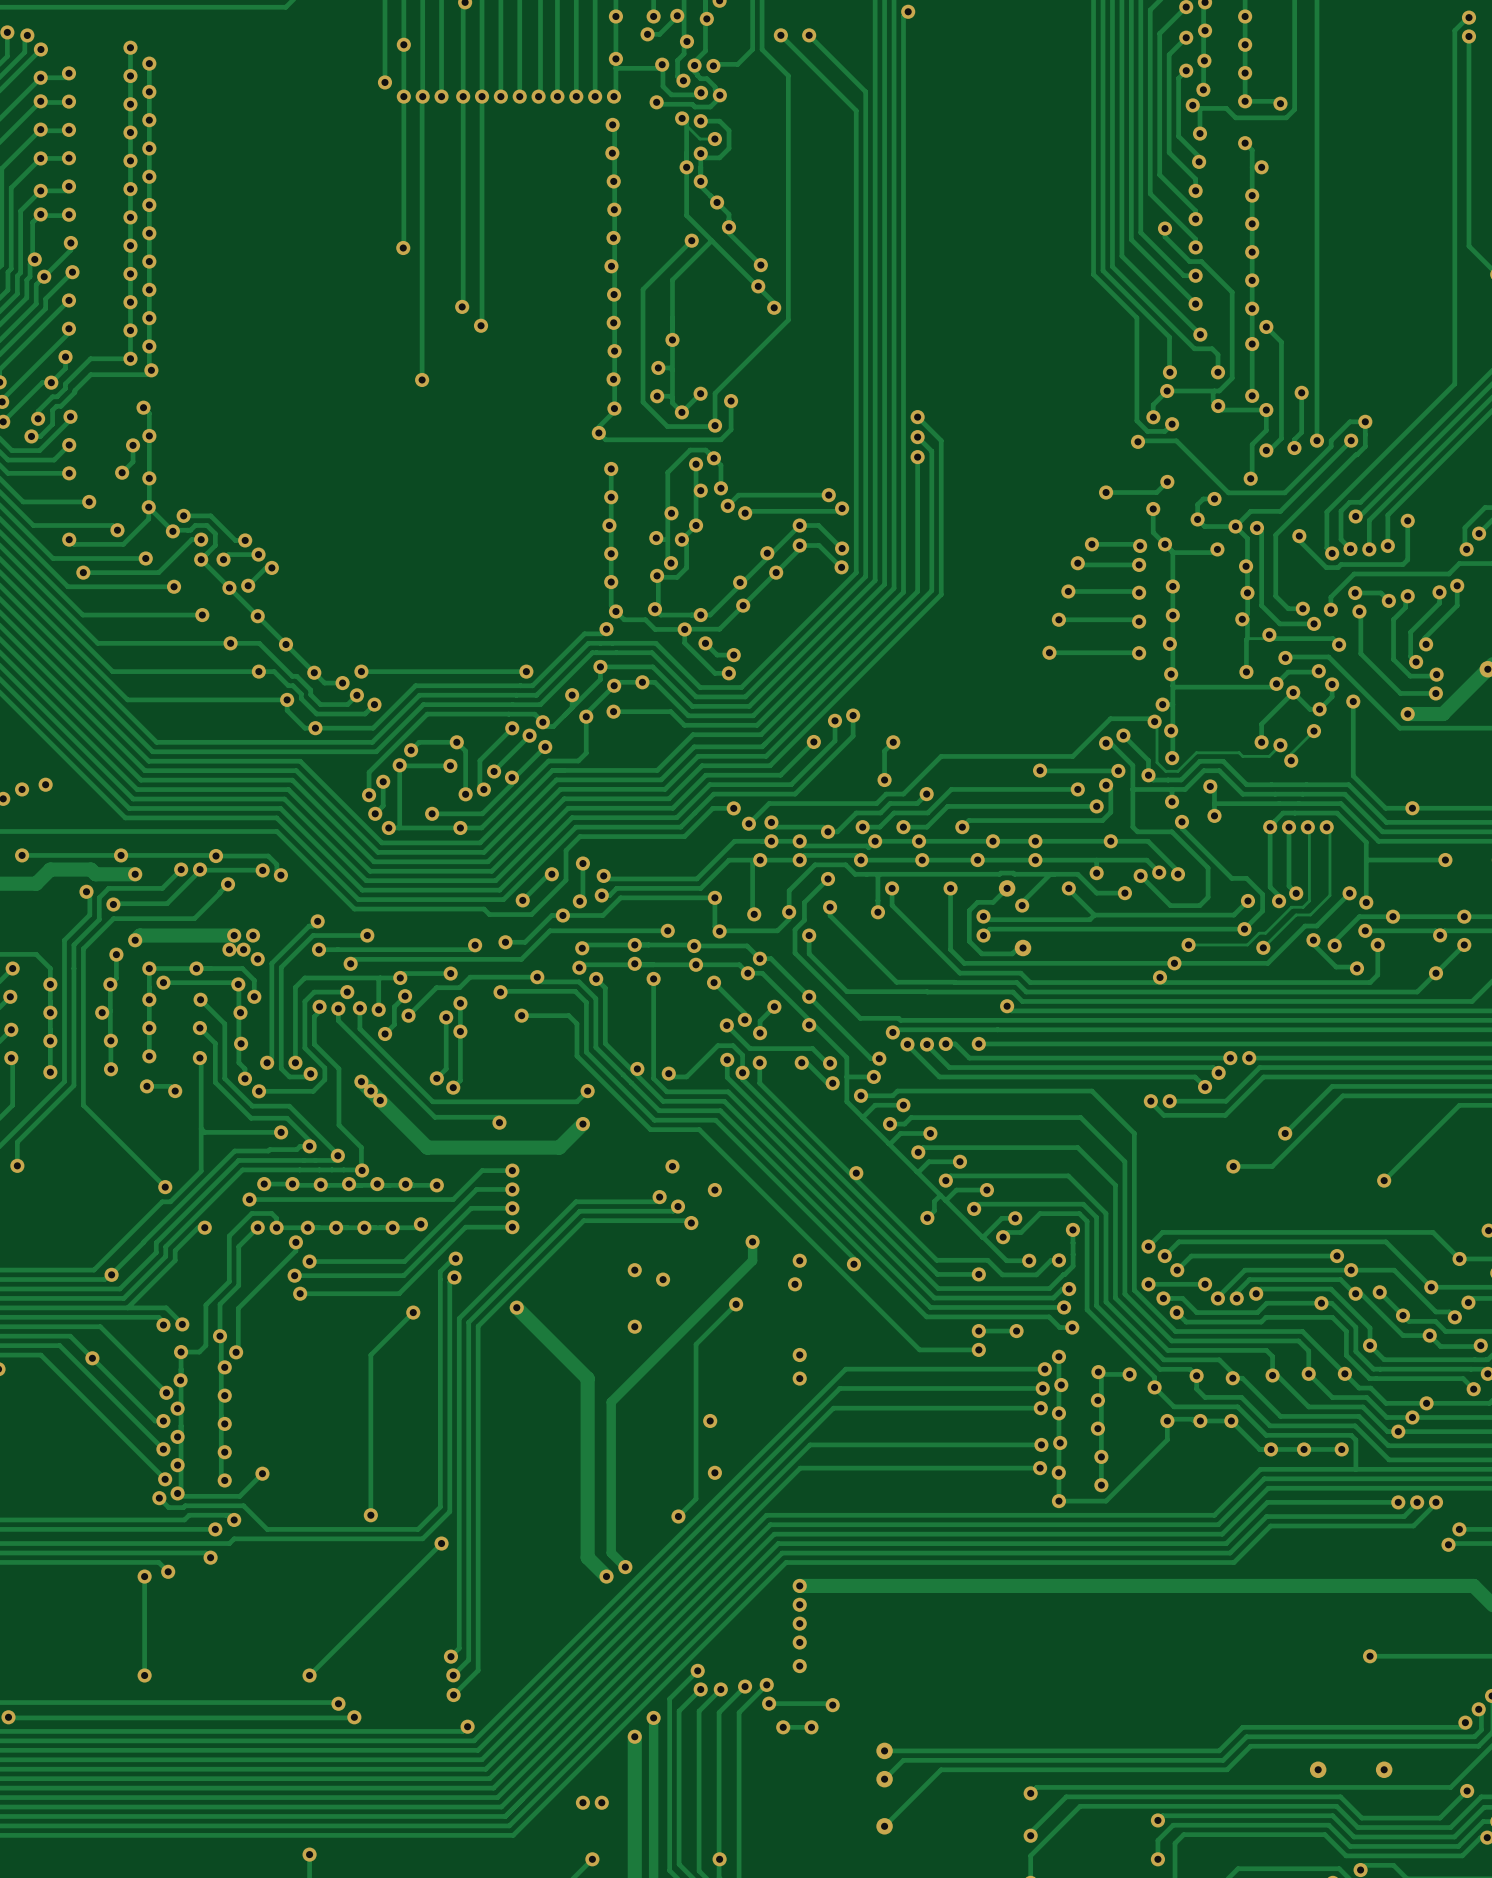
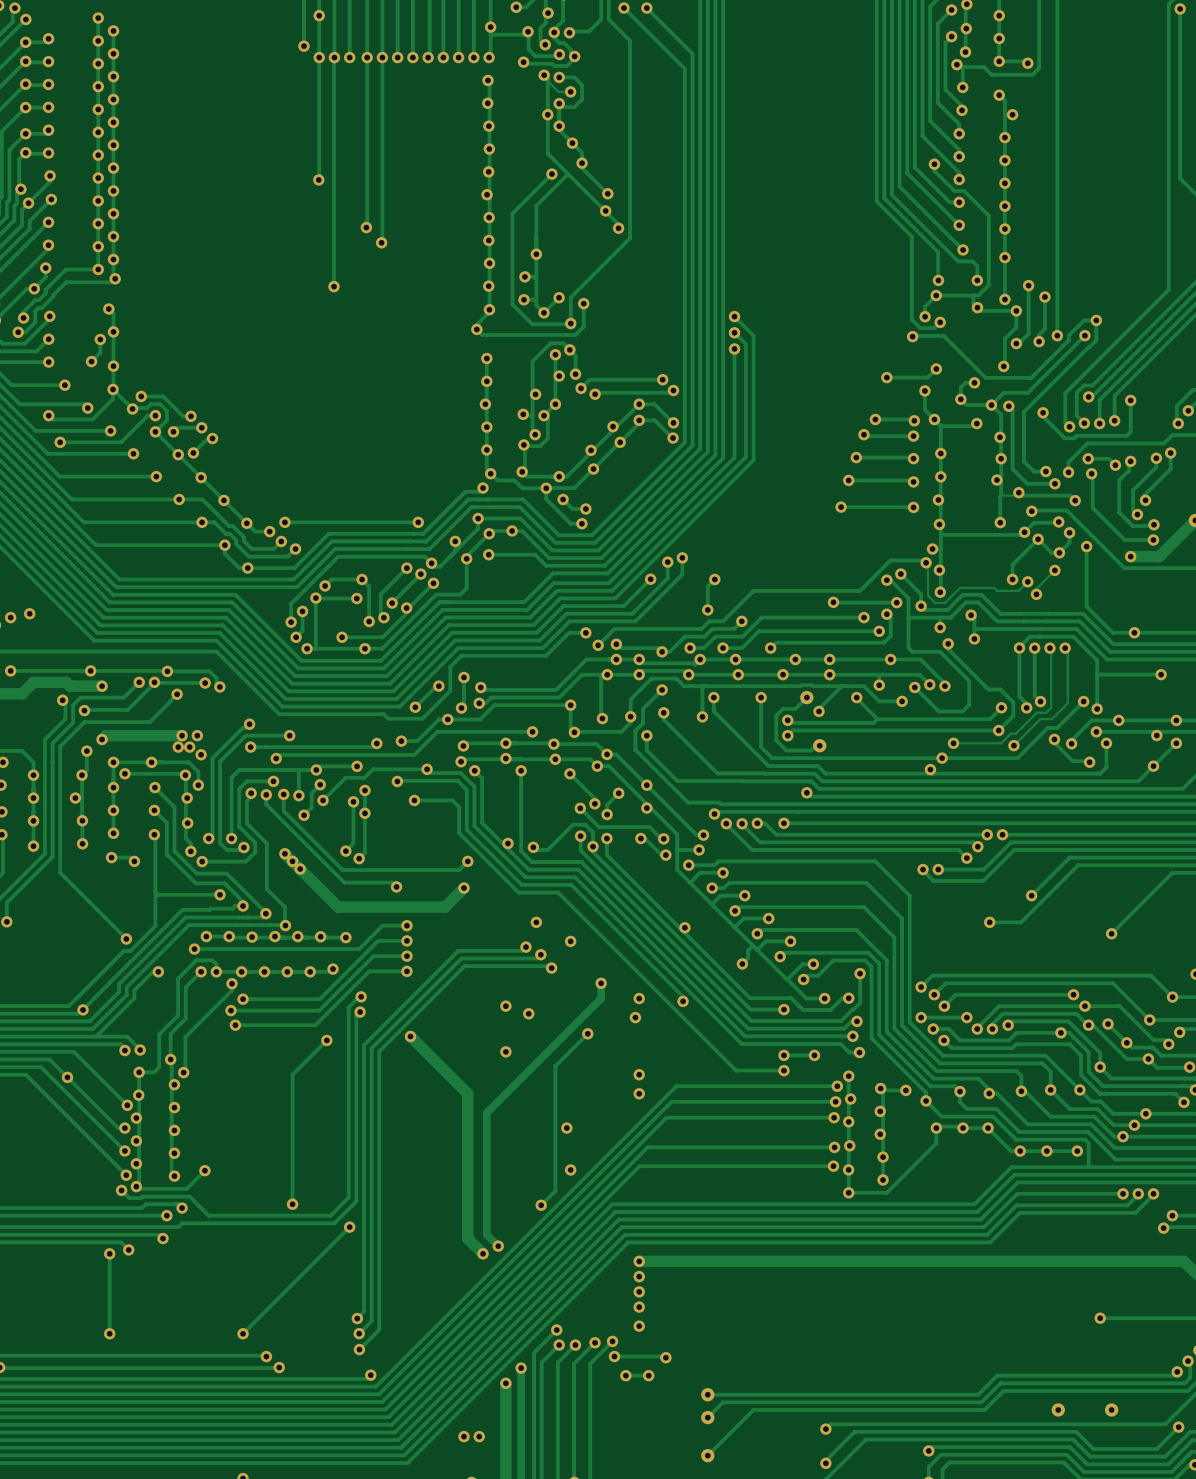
track: (1266, 326) (1281, 342) (1281, 378) -> none
via position: (1266, 326) -> (1028, 285)

